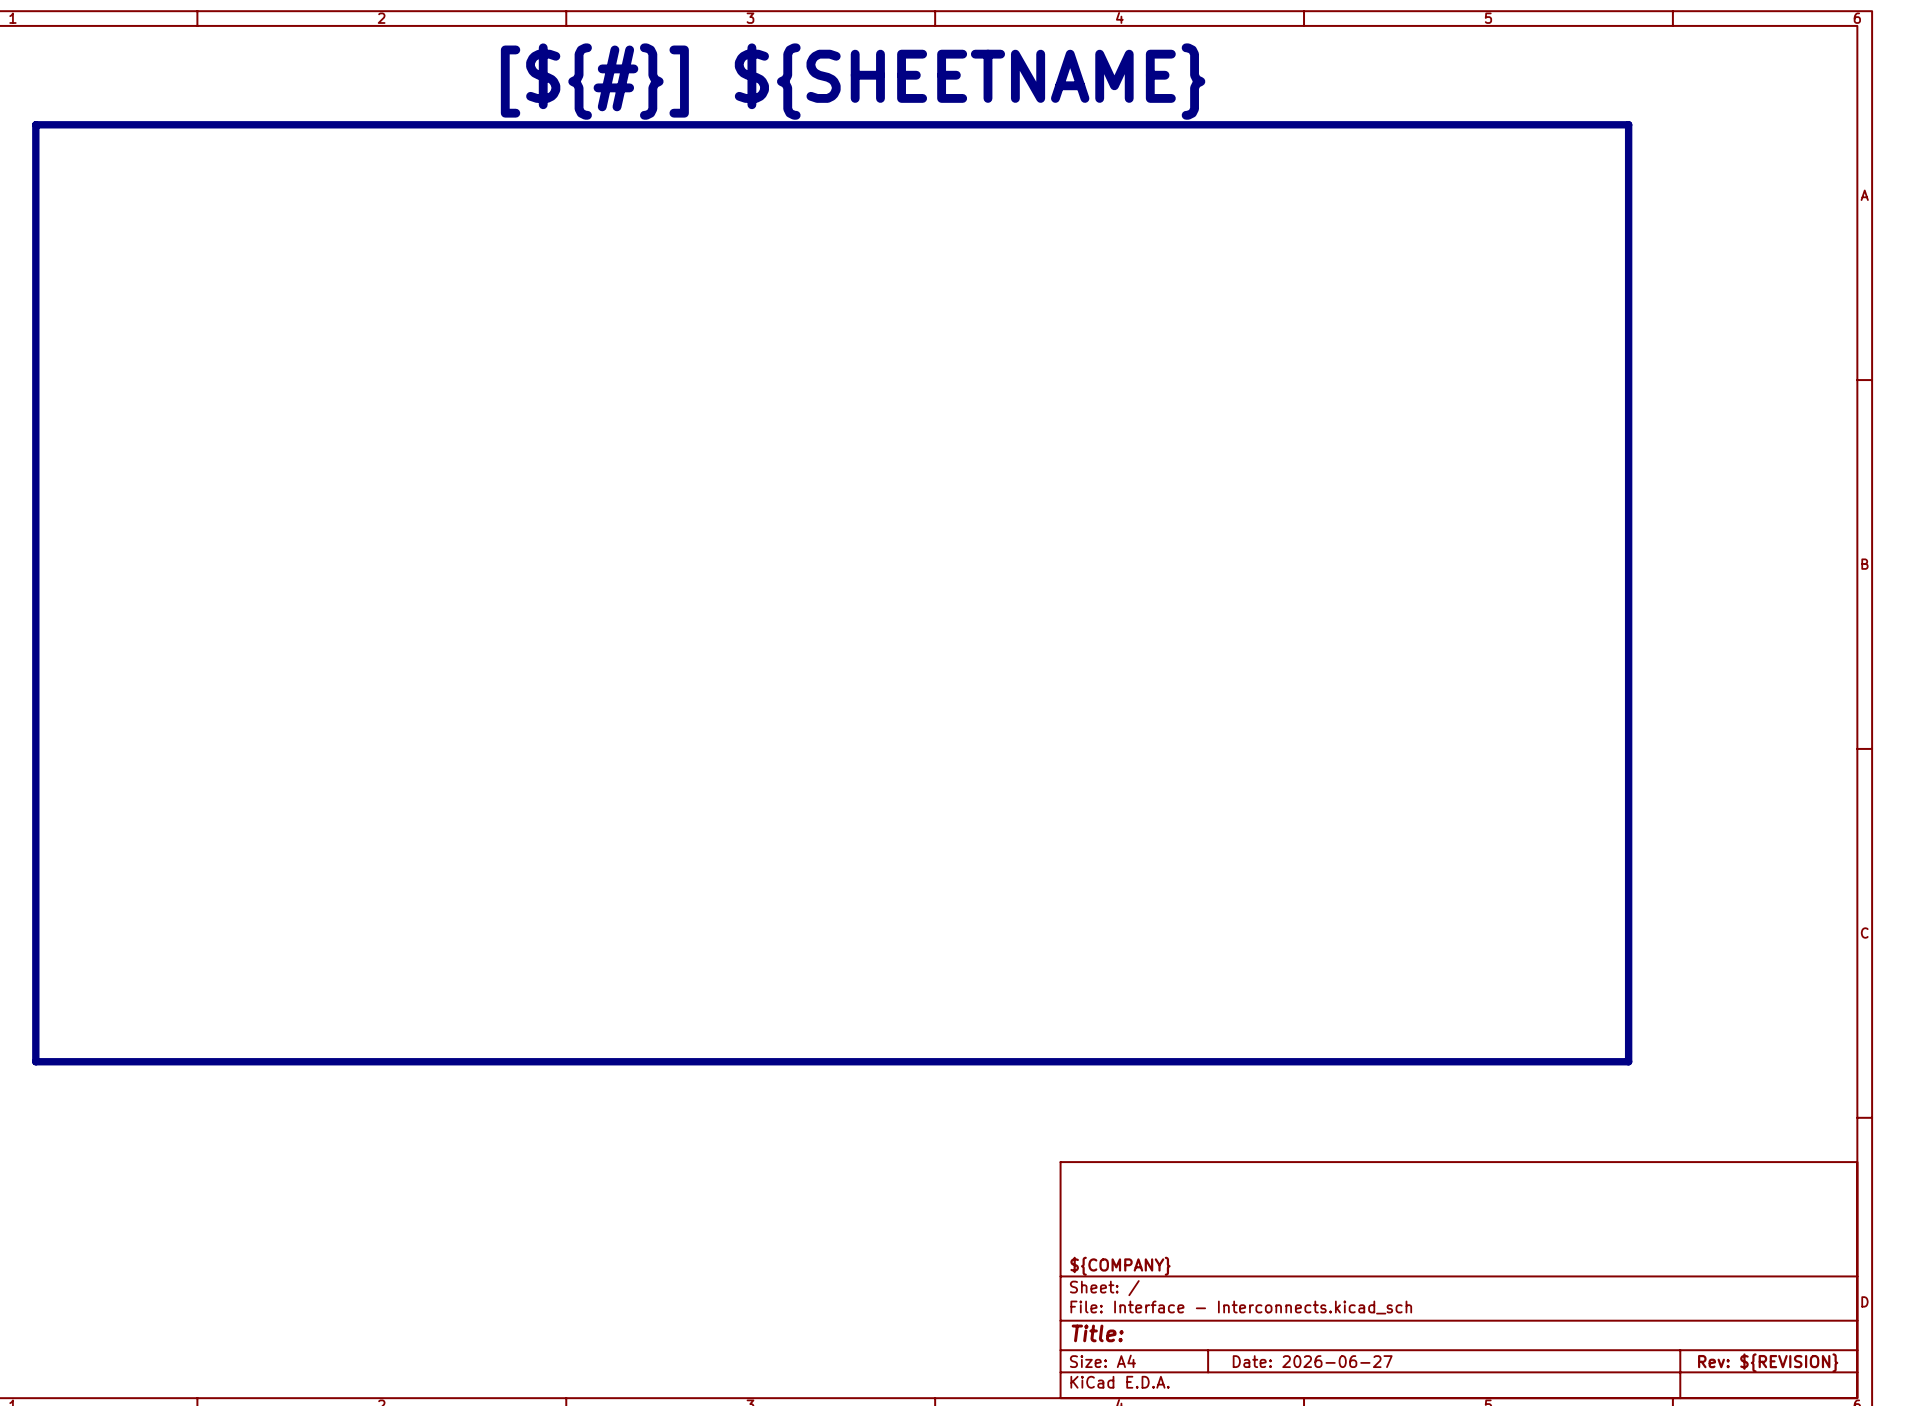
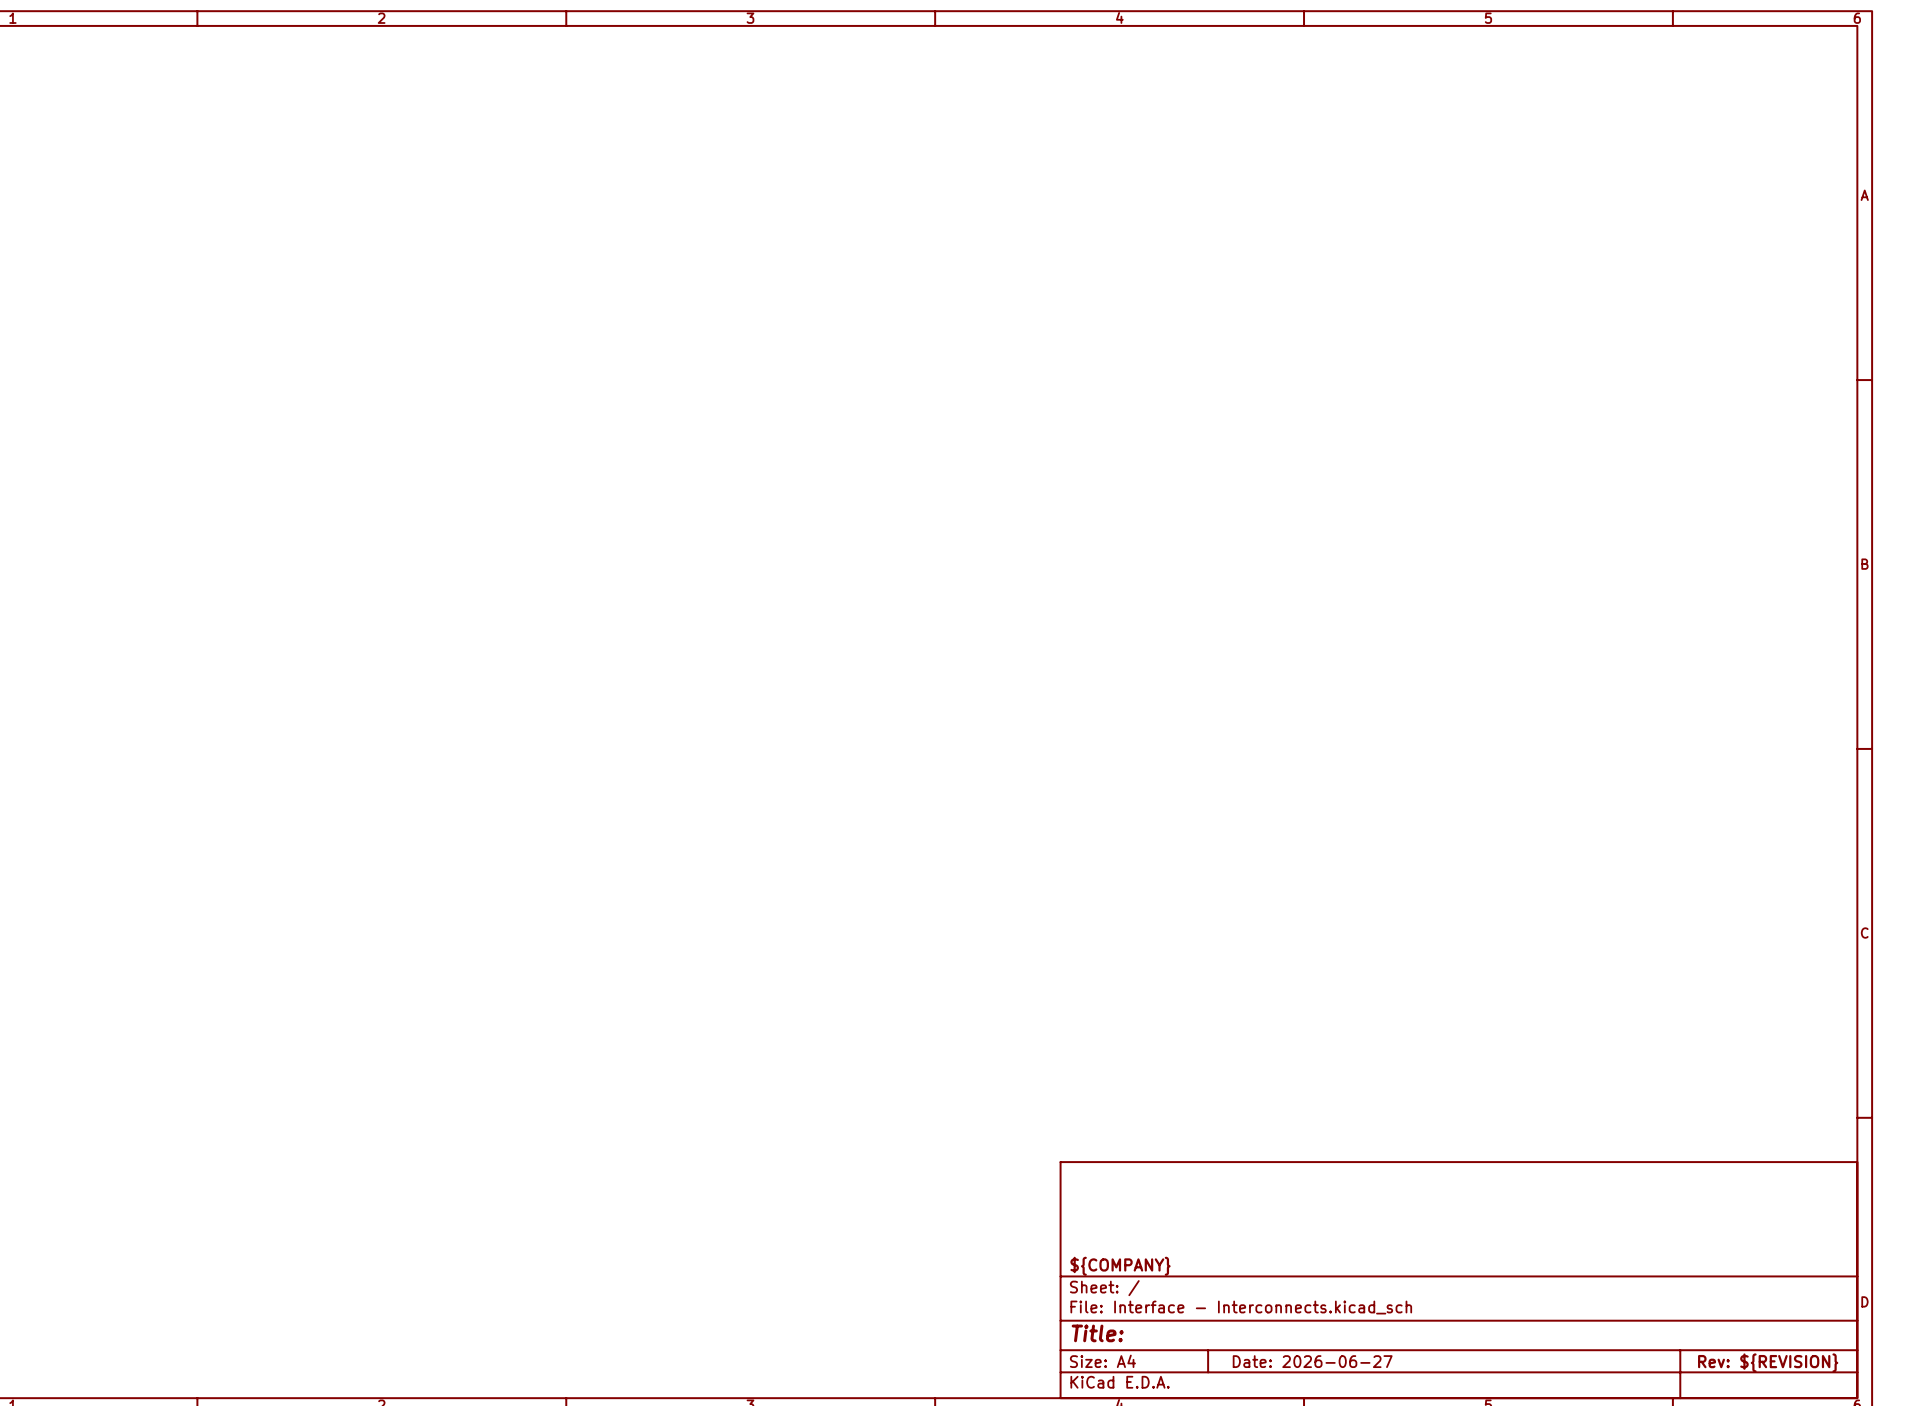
text: [${#}] ${SHEETNAME} (853, 81) -> none
line: (35, 124) (1628, 124) (1628, 1061) (35, 1061) (35, 124) -> none

